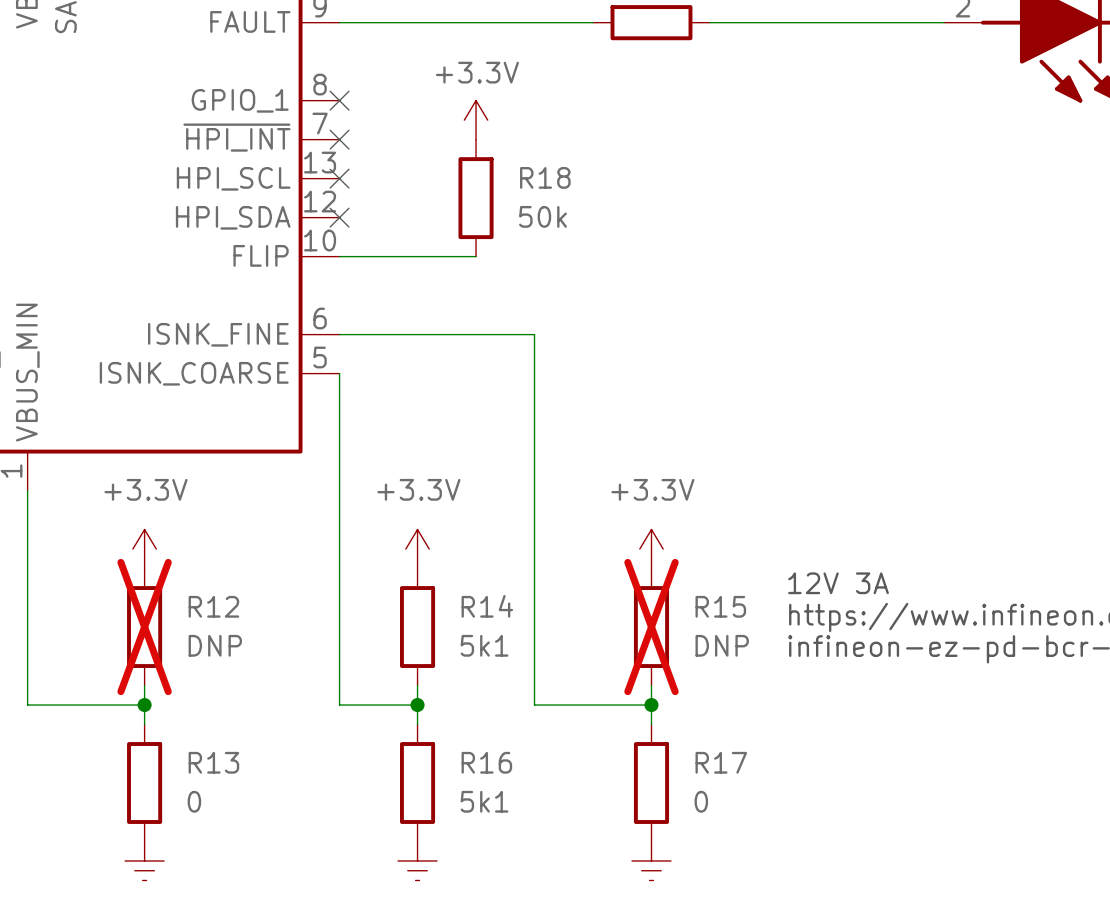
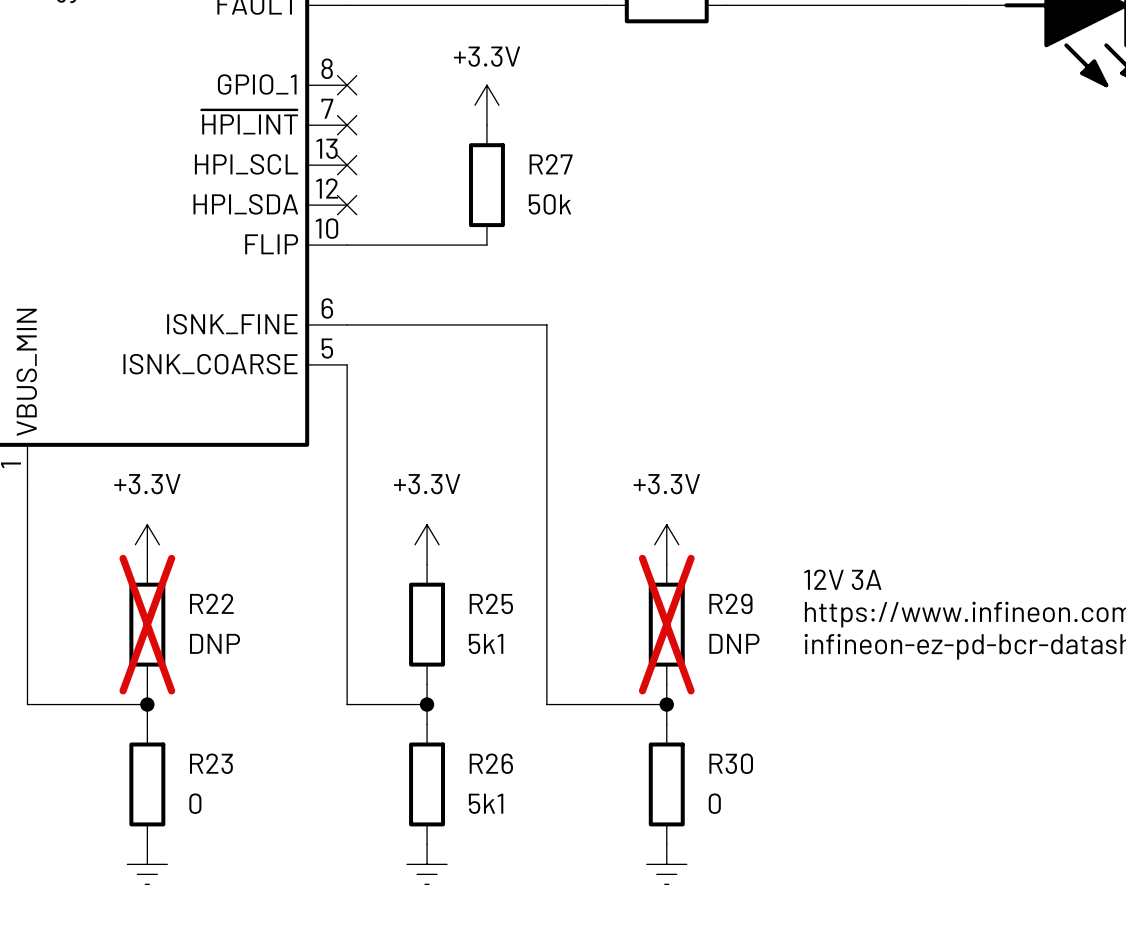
R18 name: R18 (545, 177) -> R27 (551, 164)
R12 name: R12 (213, 606) -> R22 (211, 603)
R14 name: R14 (487, 606) -> R25 (491, 603)
R15 name: R15 (720, 606) -> R29 (730, 603)
R13 name: R13 (213, 762) -> R23 (211, 763)
R16 name: R16 (486, 762) -> R26 (491, 763)
R17 name: R17 (721, 762) -> R30 (731, 763)

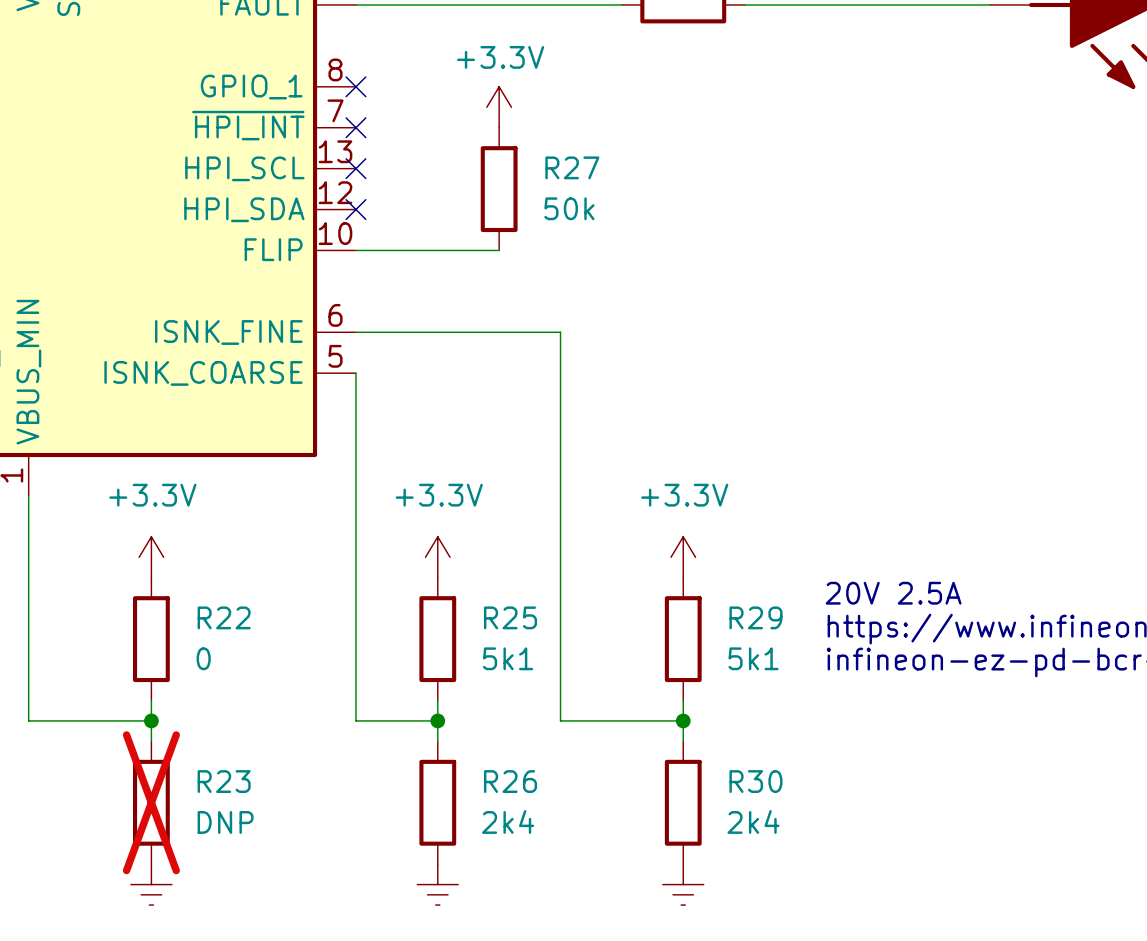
text: 12V 3A (842, 579) -> 20V 2.5A (893, 593)
R22 do-not-place cross: (147, 624) -> none
R29 do-not-place cross: (666, 624) -> none
R22 value: DNP (215, 643) -> 0 (203, 658)
R29 value: DNP (734, 643) -> 5k1 (753, 658)
R23 do-not-place cross: none -> (151, 802)
R23 value: 0 (195, 803) -> DNP (225, 822)
R26 value: 5k1 (486, 803) -> 2k4 (508, 821)
R30 value: 0 (714, 803) -> 2k4 (753, 821)

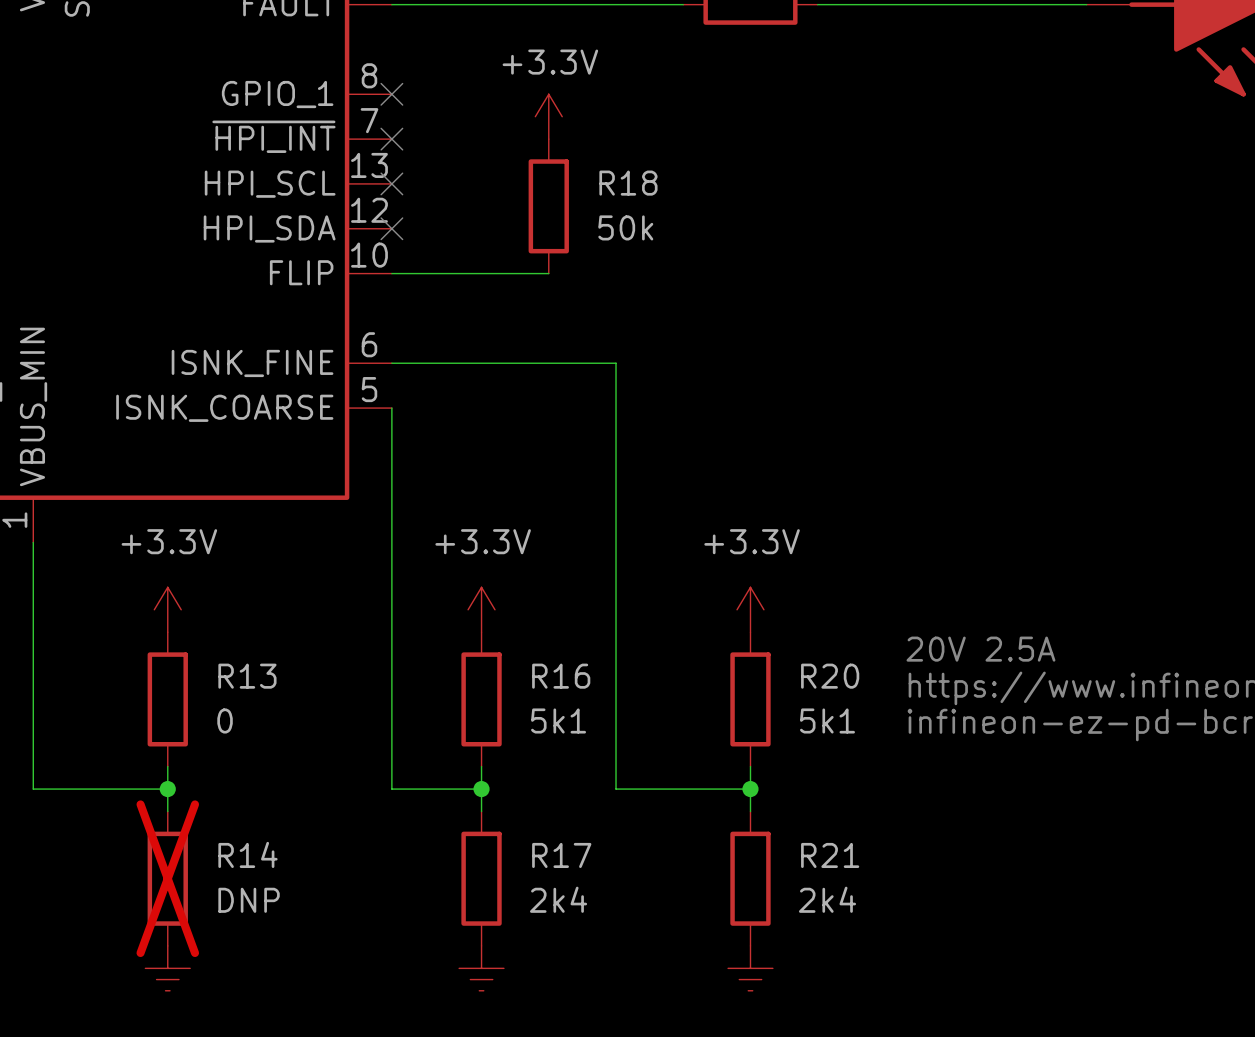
R27 name: R27 (572, 167) -> R18 (628, 183)
R22 name: R22 (224, 617) -> R13 (247, 676)
R25 name: R25 (510, 617) -> R16 (561, 676)
R29 name: R29 (755, 617) -> R20 (830, 676)
R23 name: R23 (224, 781) -> R14 (247, 854)
R26 name: R26 (510, 781) -> R17 (561, 855)
R30 name: R30 (755, 781) -> R21 (830, 855)

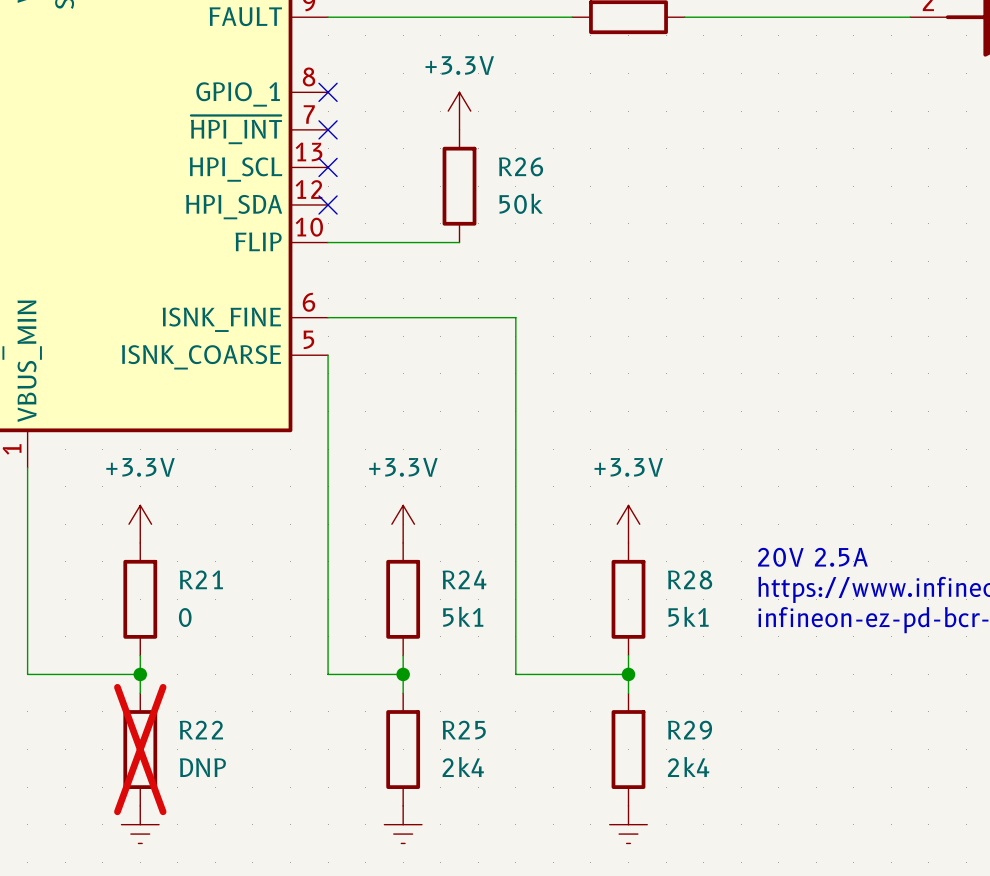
R18 name: R18 (628, 183) -> R26 (521, 166)
R13 name: R13 (247, 676) -> R21 (201, 579)
R16 name: R16 (561, 676) -> R24 (464, 579)
R20 name: R20 (830, 676) -> R28 (690, 579)
R14 name: R14 (247, 854) -> R22 (201, 730)
R17 name: R17 (561, 855) -> R25 (464, 730)
R21 name: R21 (830, 855) -> R29 (690, 730)

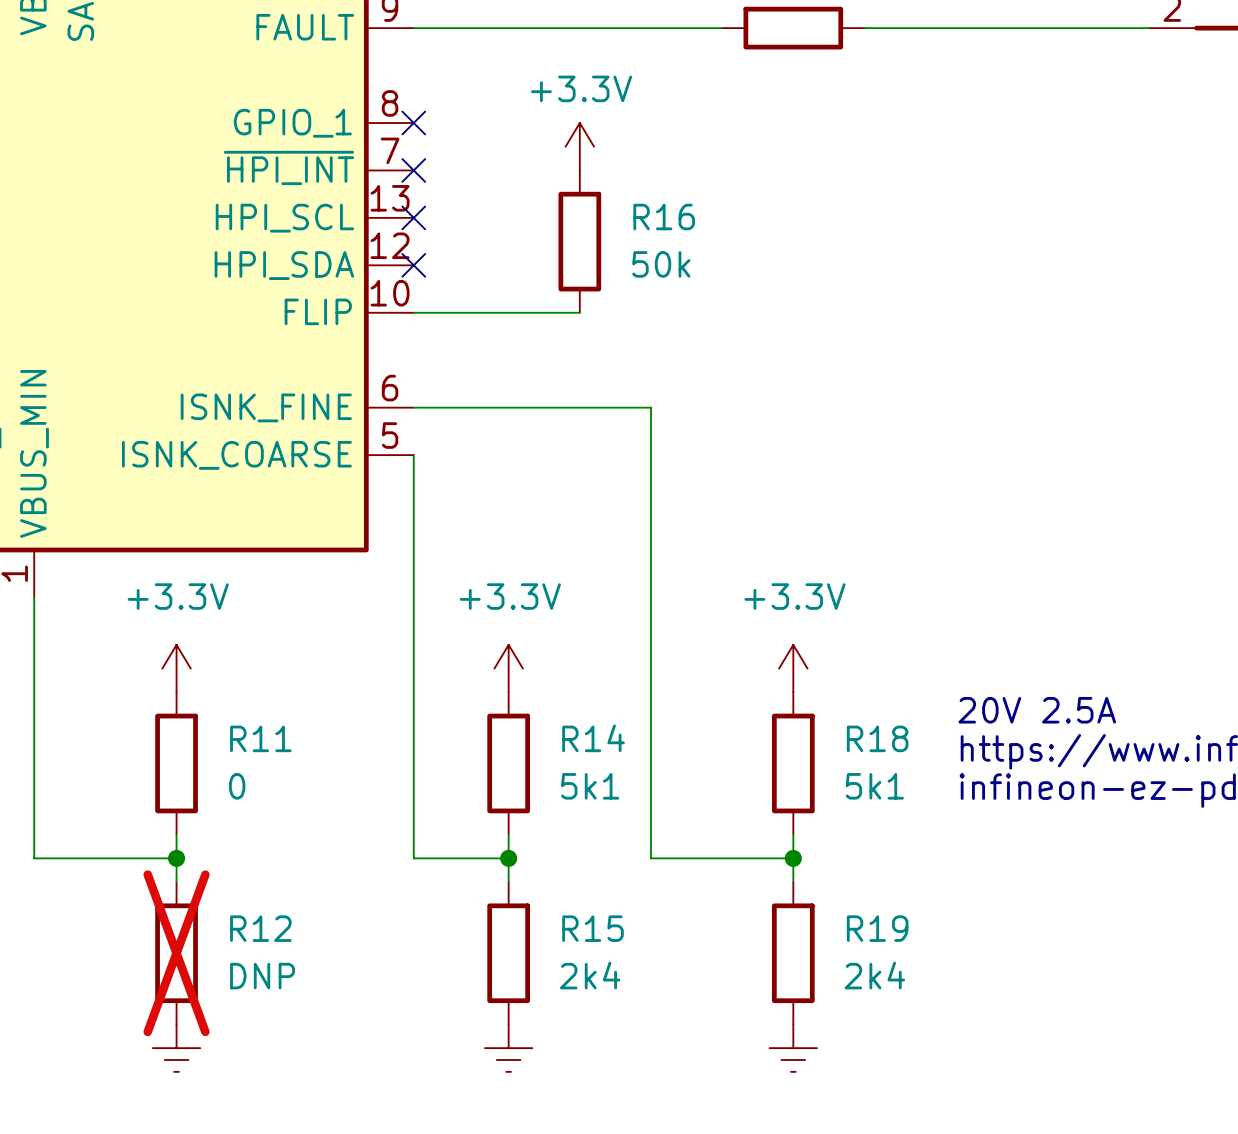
R26 name: R26 (521, 166) -> R16 (664, 217)
R21 name: R21 (201, 579) -> R11 (260, 738)
R24 name: R24 (464, 579) -> R14 (593, 738)
R28 name: R28 (690, 579) -> R18 (877, 738)
R22 name: R22 (201, 730) -> R12 (260, 928)
R25 name: R25 (464, 730) -> R15 (592, 928)
R29 name: R29 (690, 730) -> R19 (877, 928)

